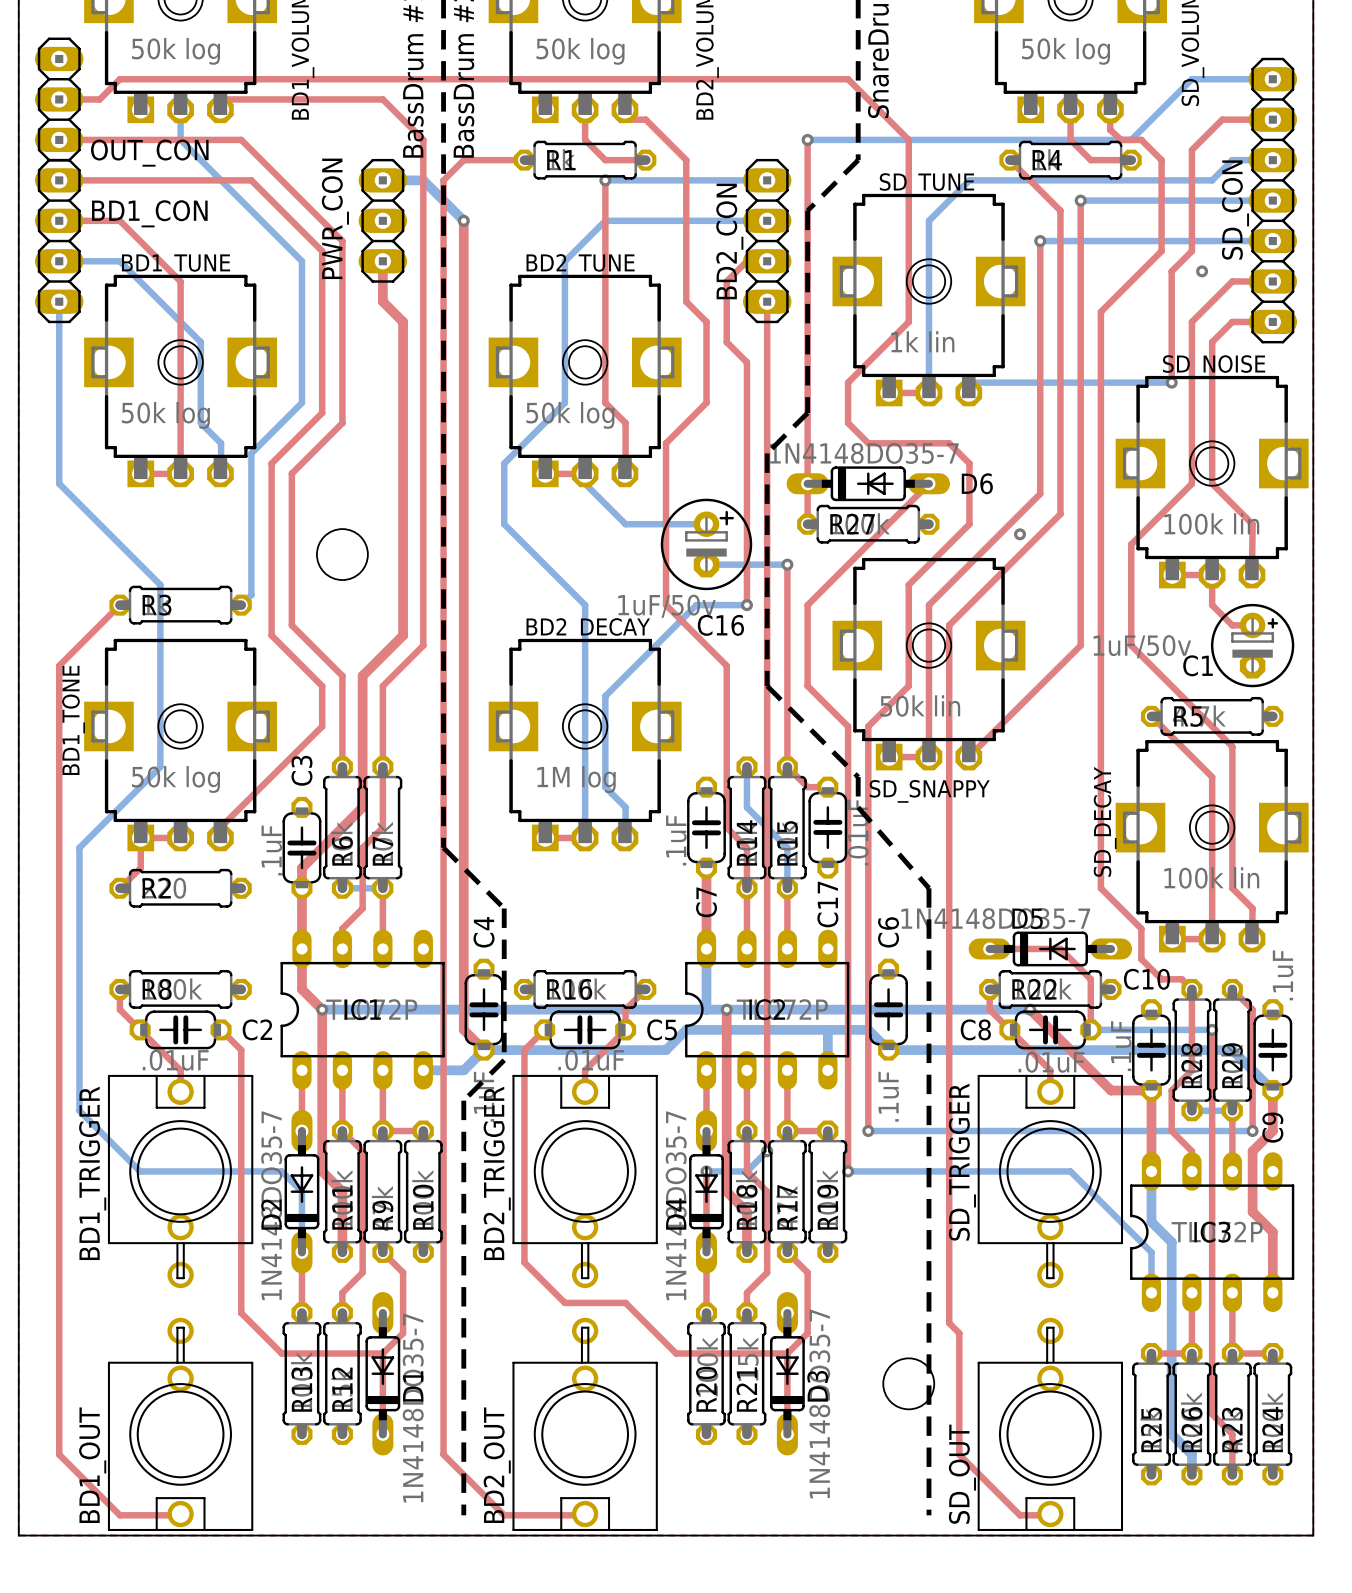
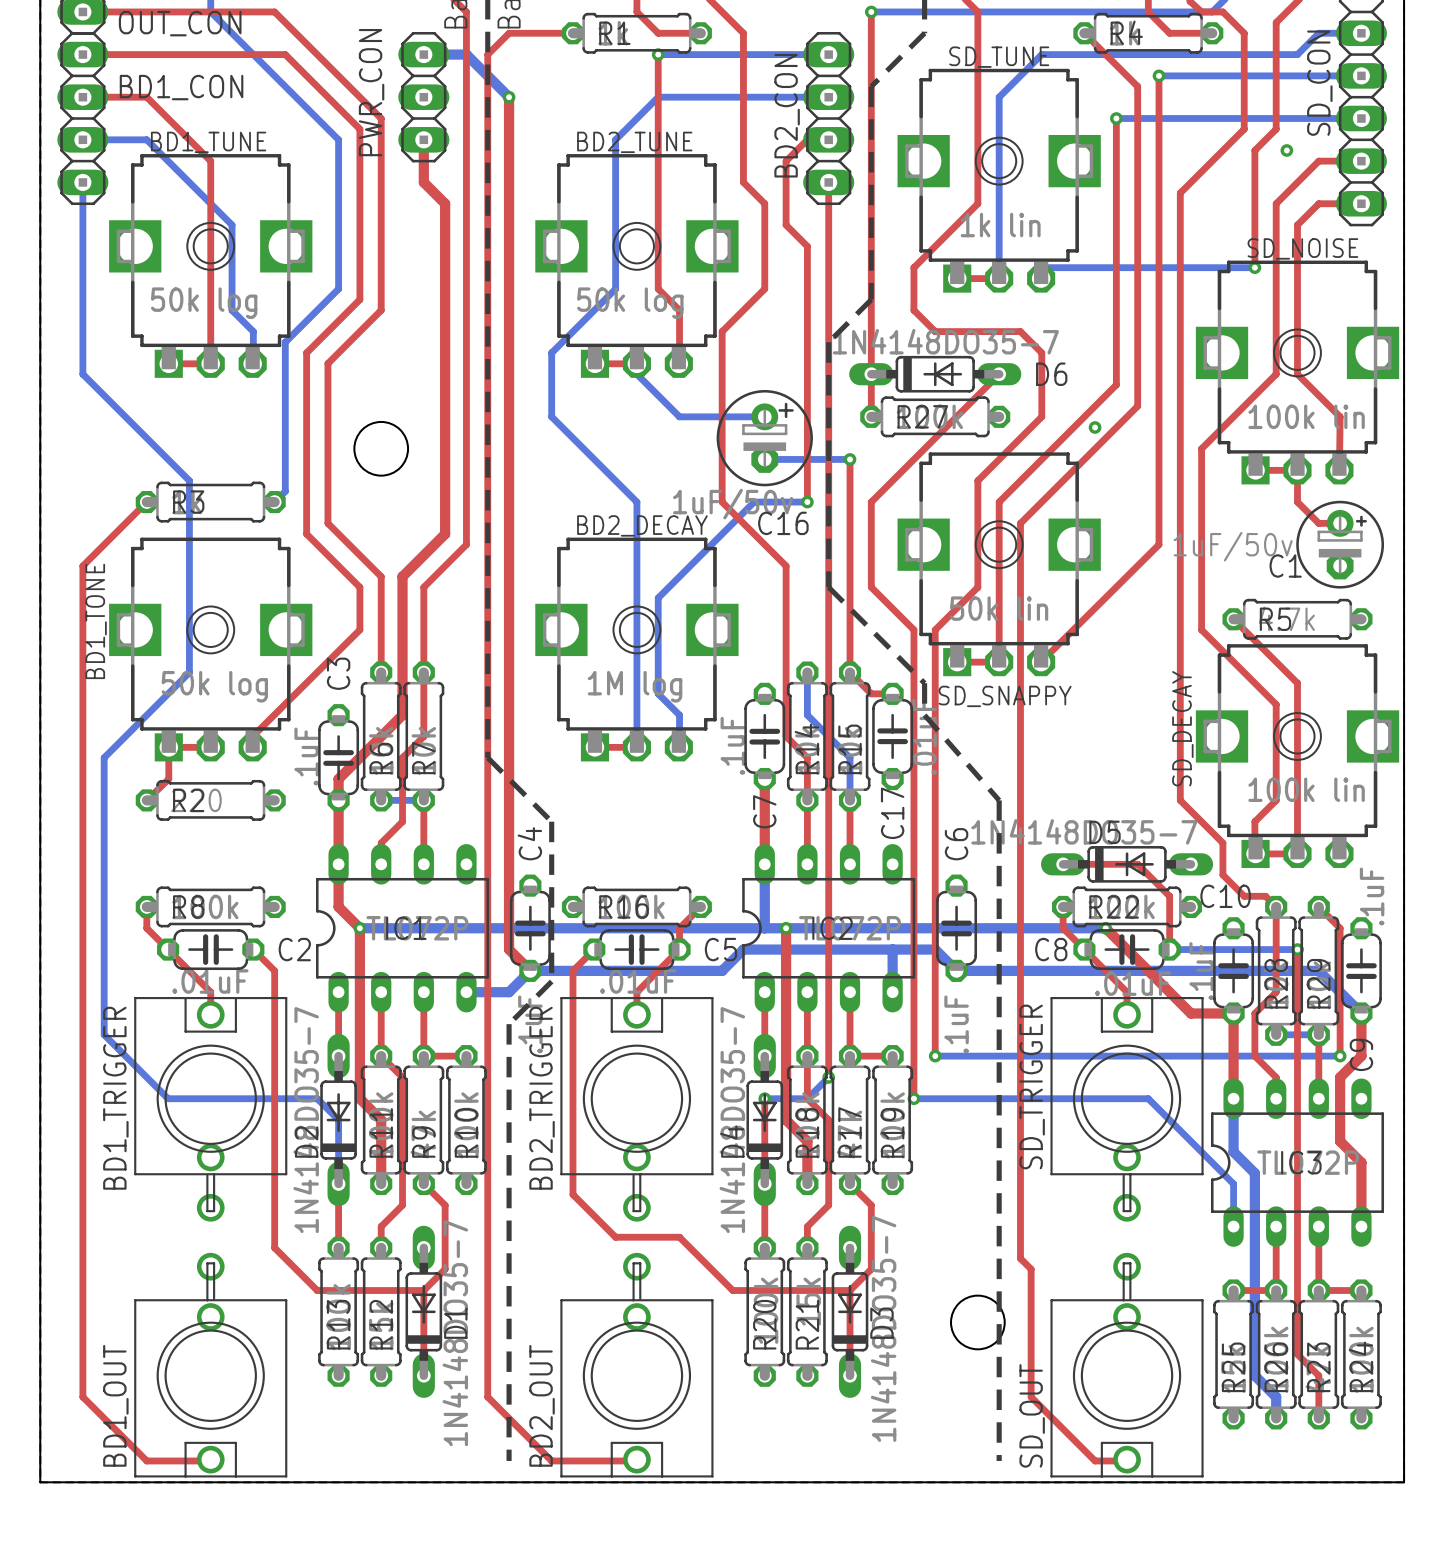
top track: (1131, 544) (1131, 645) (1232, 746) (1232, 888) (1252, 908) (1251, 939) -> (1212, 438) (1201, 448) (1201, 629) (1276, 704) (1276, 800) (1254, 821) (1255, 853)

